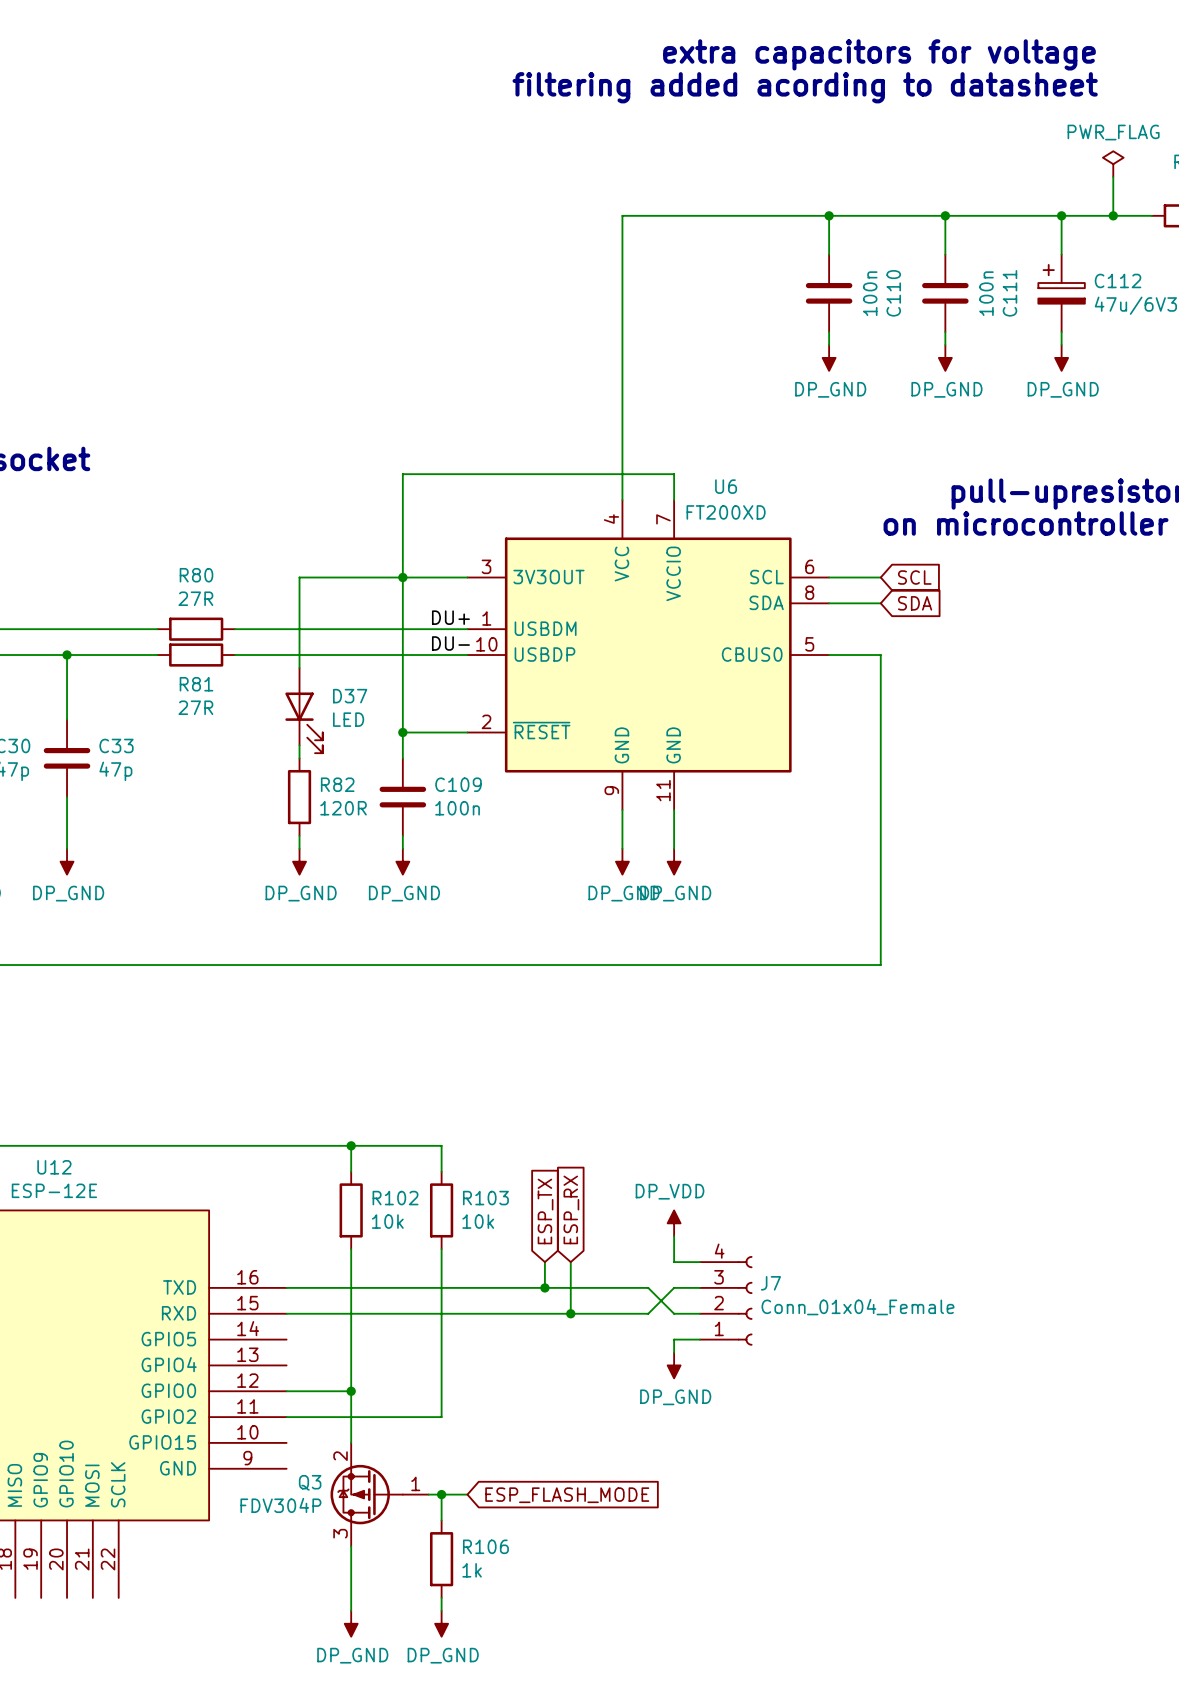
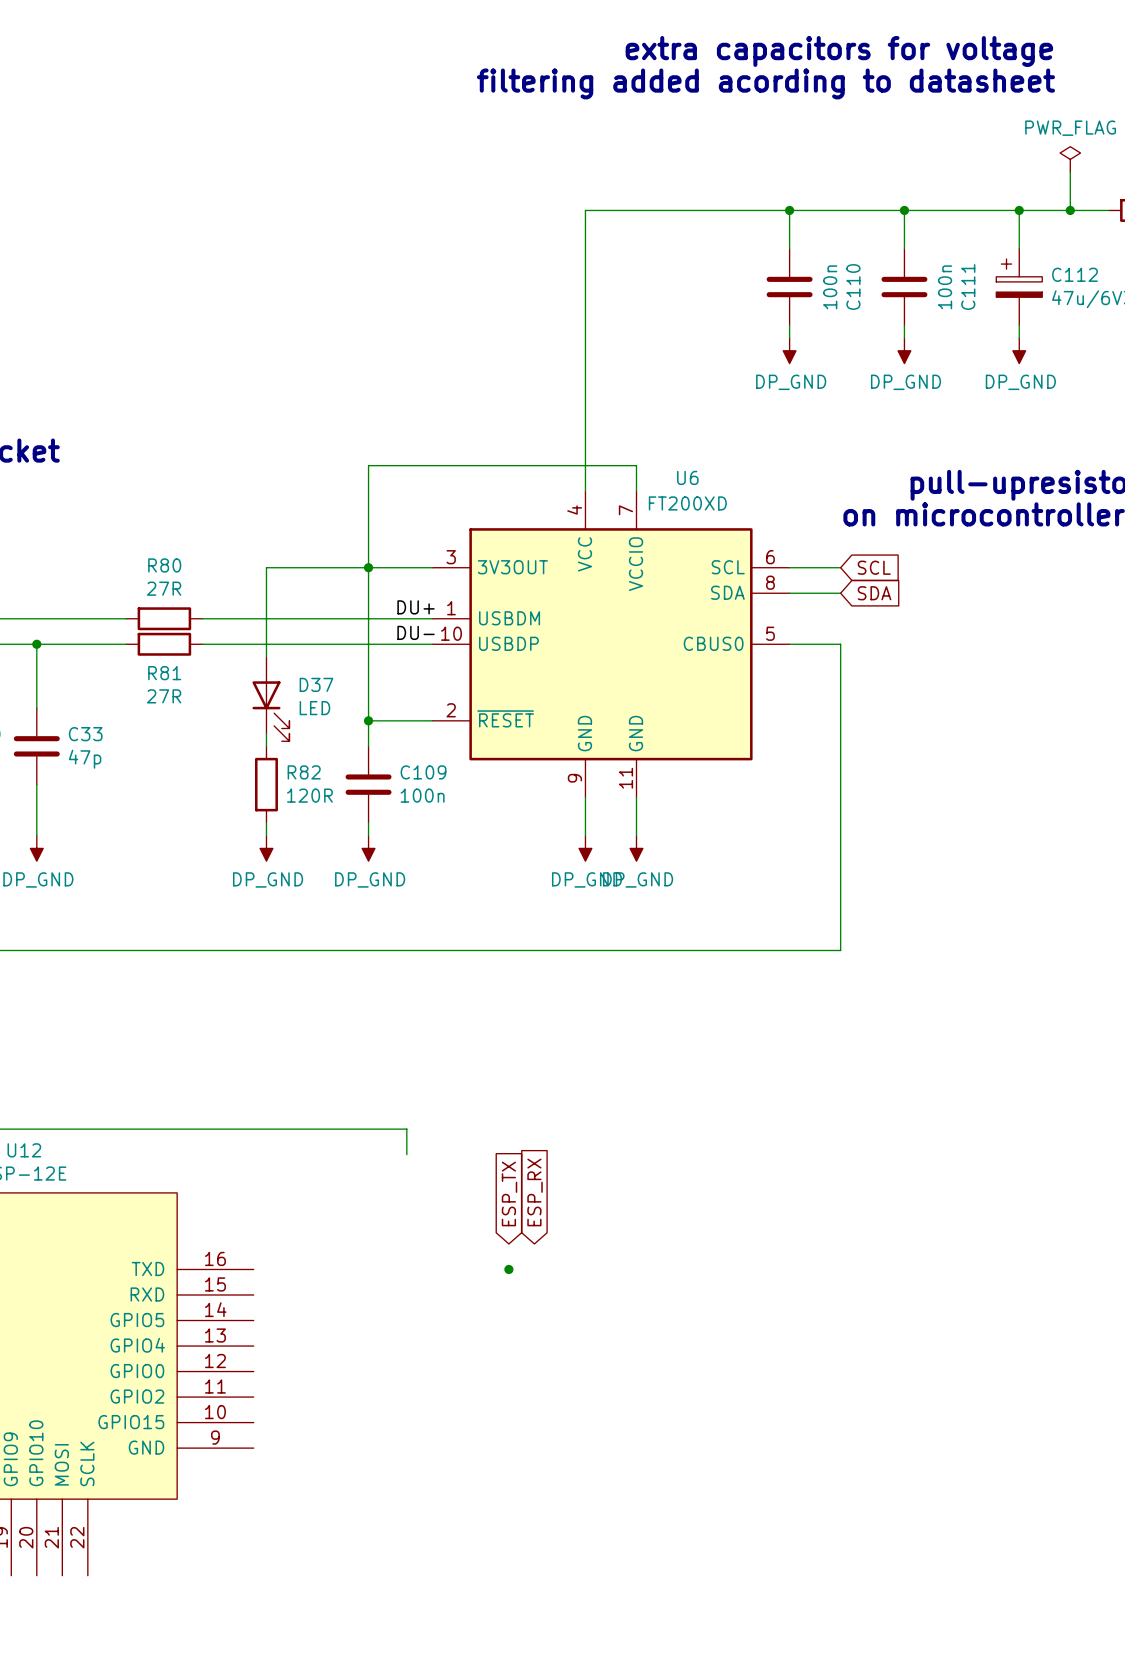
wire: (351, 1145) (351, 1171) -> none
junction: (351, 1145) -> none
R102: 10k (351, 1210) -> none
R103: 10k (441, 1210) -> none
power symbol: DP_VDD (674, 1223) -> none
wire: (674, 1236) (674, 1262) (699, 1262) -> none
wire: (351, 1249) (351, 1442) -> none
wire: (441, 1249) (441, 1417) (286, 1417) -> none
wire: (544, 1262) (544, 1287) -> none
wire: (570, 1262) (570, 1313) -> none
wire: (286, 1287) (648, 1287) (674, 1313) (699, 1313) -> none
wire: (699, 1287) (674, 1287) (648, 1313) (286, 1313) -> none
J7: Conn_01x04_Female (726, 1300) -> none
junction: (570, 1313) -> none
wire: (699, 1339) (674, 1339) (674, 1352) -> none
power symbol: DP_GND (674, 1365) -> none
wire: (286, 1391) (351, 1391) -> none
junction: (351, 1391) -> none
Q3: FDV304P (379, 1494) -> none
wire: (428, 1494) (467, 1494) -> none
wire: (441, 1494) (441, 1520) -> none
junction: (441, 1494) -> none
global label: ESP_FLASH_MODE (567, 1495) -> none
wire: (351, 1546) (351, 1610) -> none
R106: 1k (441, 1559) -> none
wire: (441, 1597) (441, 1610) -> none
power symbol: DP_GND (351, 1623) -> none
power symbol: DP_GND (441, 1623) -> none

